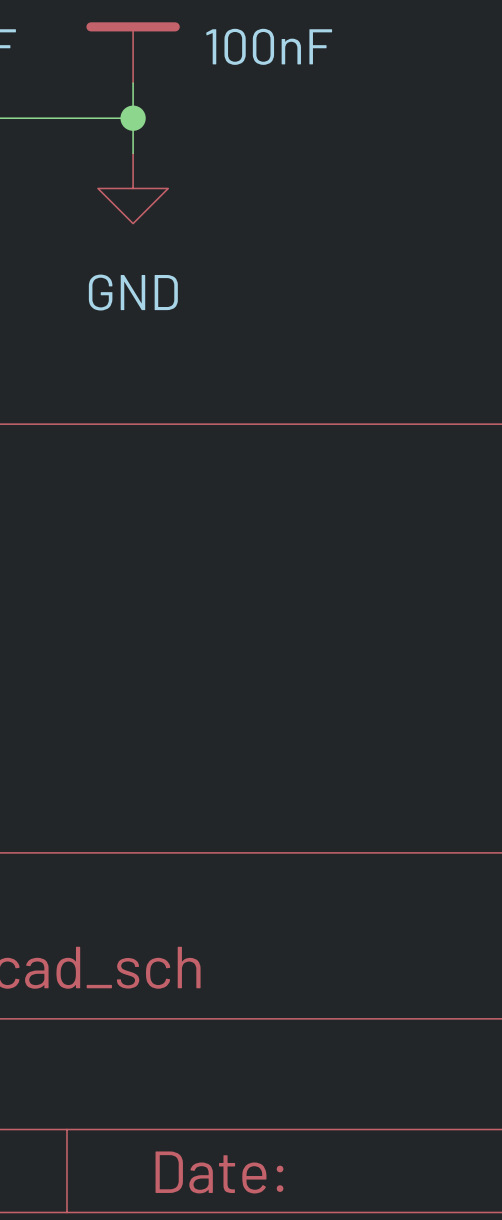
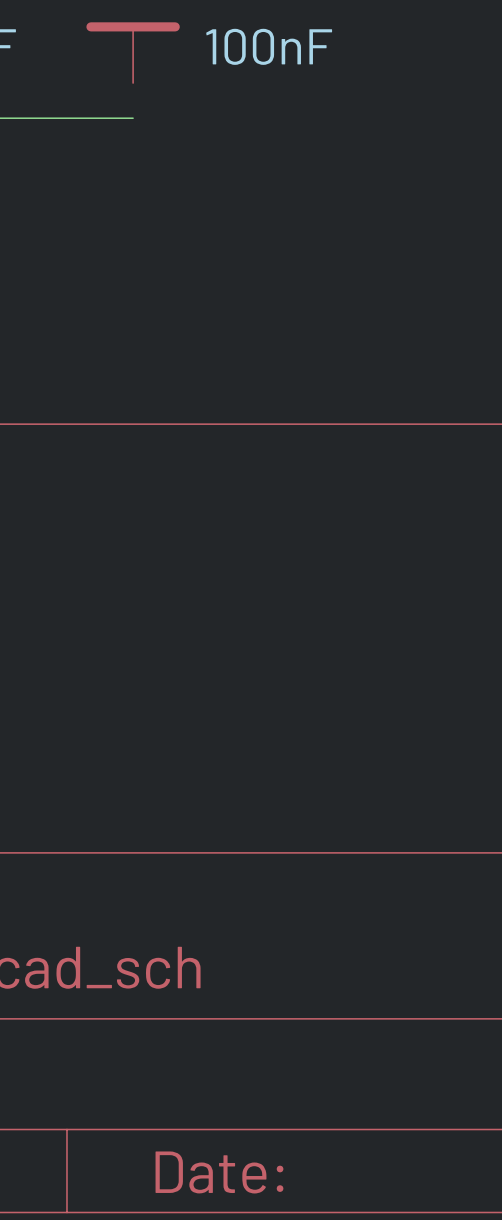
wire: (133, 83) (133, 153) -> none
junction: (133, 118) -> none
power symbol: GND (133, 188) -> none

